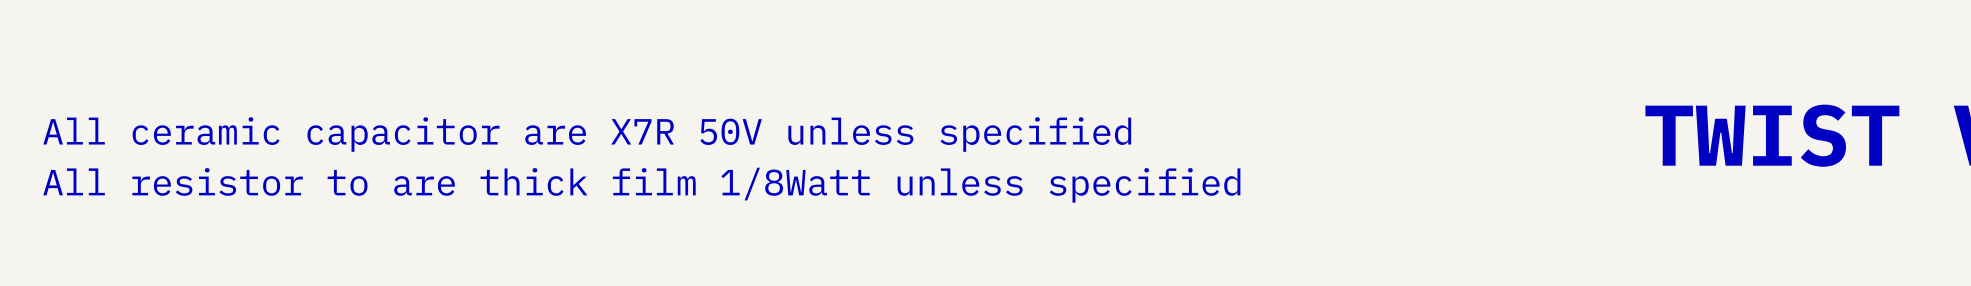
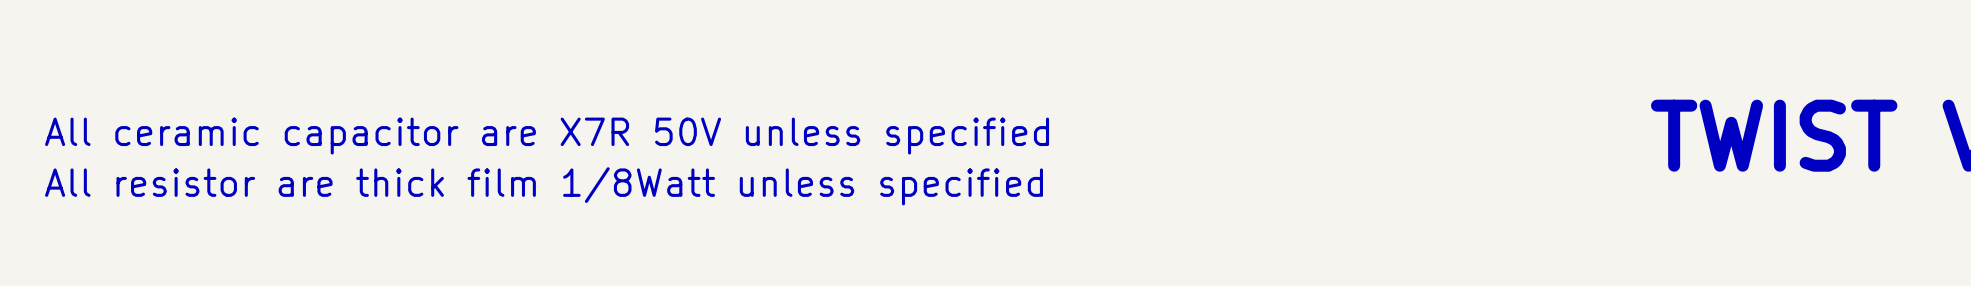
text: All resistor to are thick film 1/8Watt unless specified (641, 185) -> All resistor are thick film 1/8Watt unless specified (544, 186)

